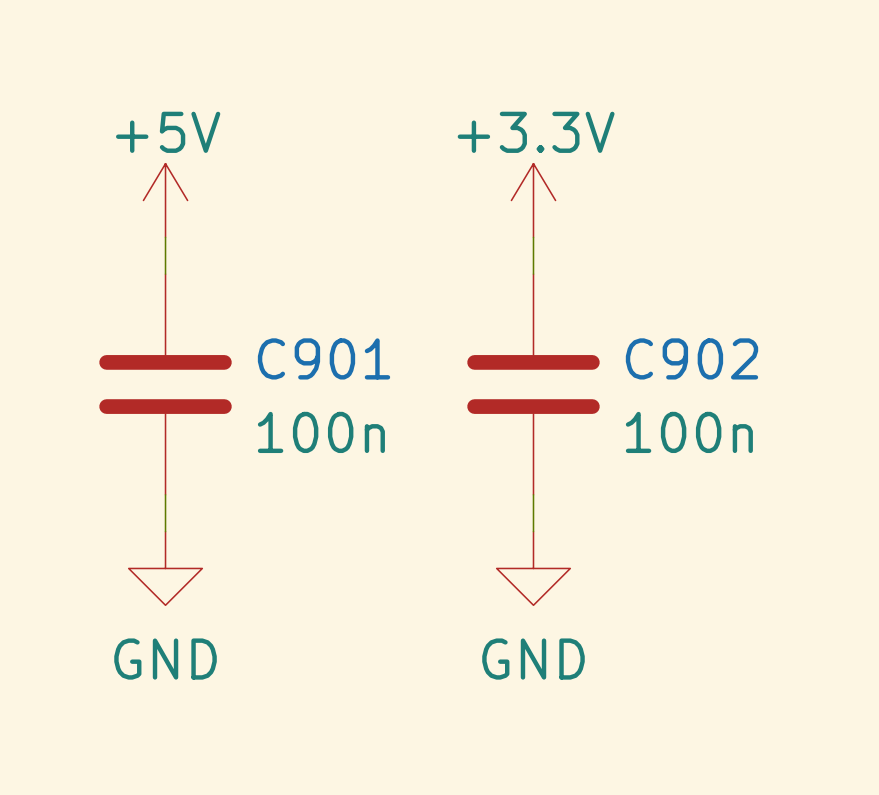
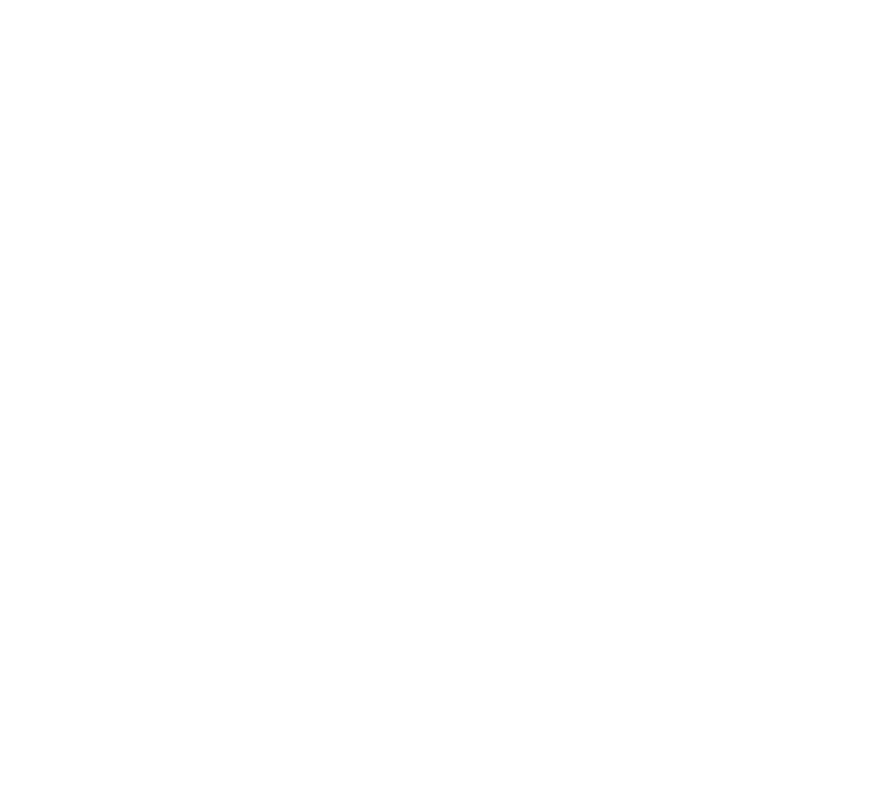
power symbol: +5V (165, 200) -> none
power symbol: +3.3V (533, 200) -> none
wire: (165, 237) (165, 274) -> none
wire: (533, 237) (533, 274) -> none
C901: 100n (165, 384) -> none
C902: 100n (533, 384) -> none
wire: (165, 494) (165, 531) -> none
wire: (533, 494) (533, 531) -> none
power symbol: GND (165, 568) -> none
power symbol: GND (533, 568) -> none

